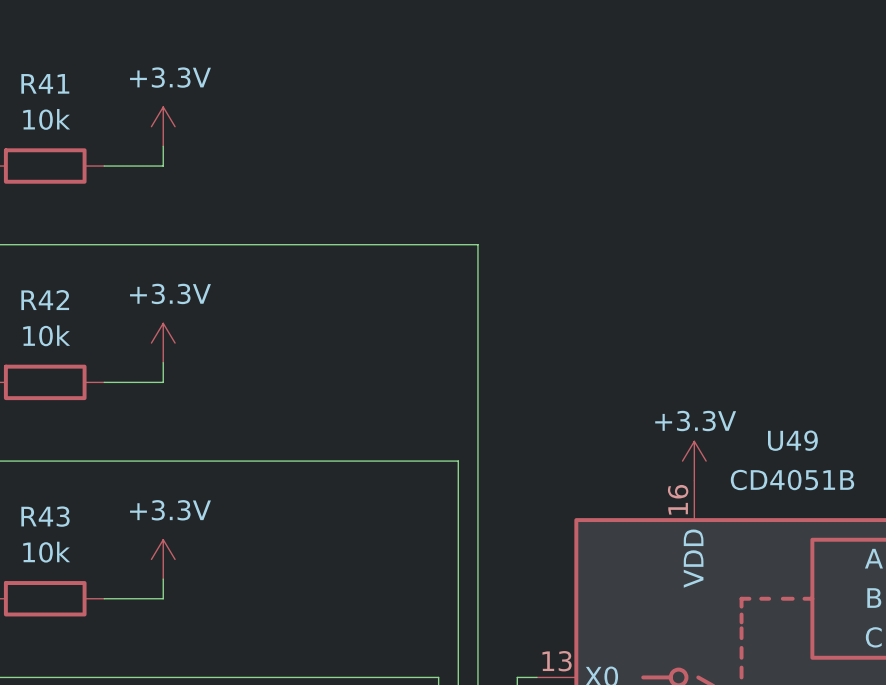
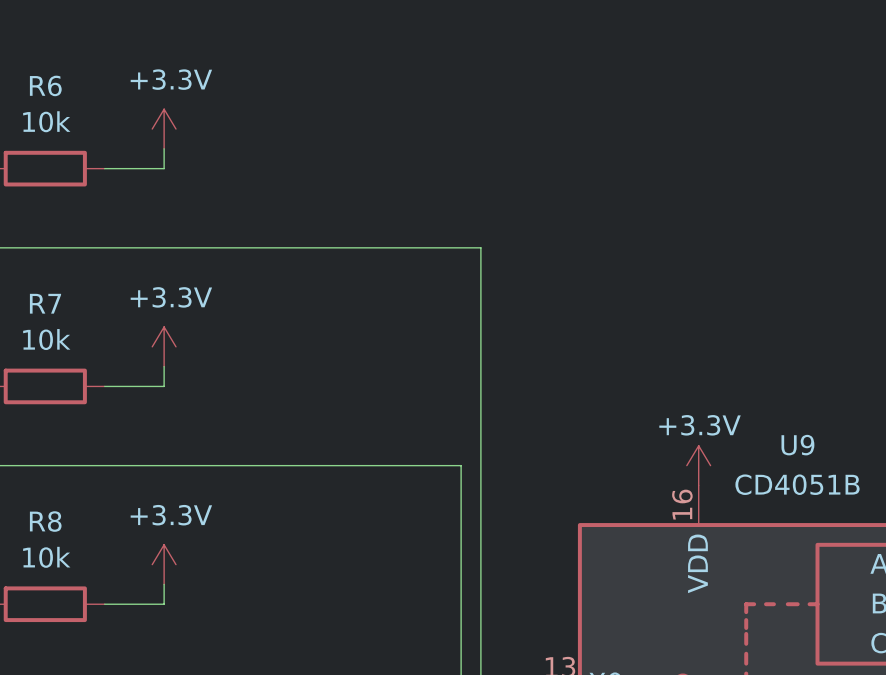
R41 name: R41 (45, 83) -> R6 (45, 85)
R42 name: R42 (45, 300) -> R7 (45, 303)
U49 name: U49 (792, 440) -> U9 (797, 445)
R43 name: R43 (45, 516) -> R8 (45, 521)

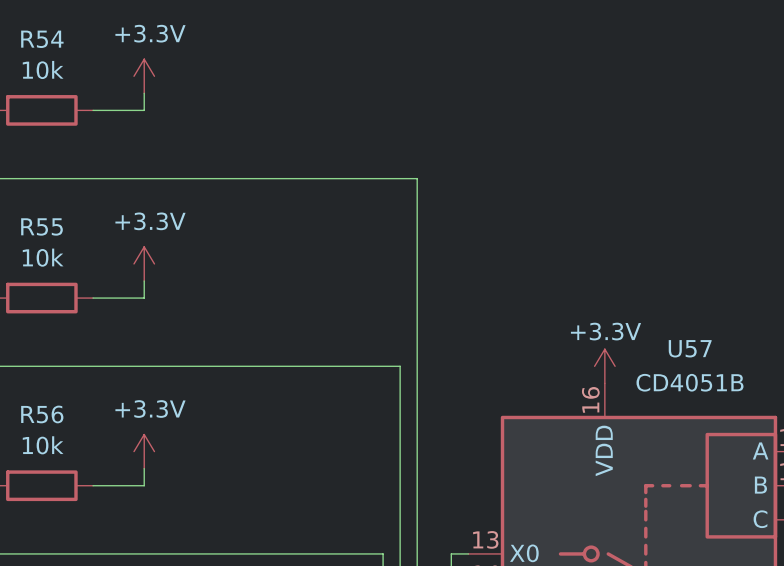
R6 name: R6 (45, 85) -> R54 (42, 39)
R7 name: R7 (45, 303) -> R55 (41, 226)
U9 name: U9 (797, 445) -> U57 (690, 348)
R8 name: R8 (45, 521) -> R56 (42, 414)

